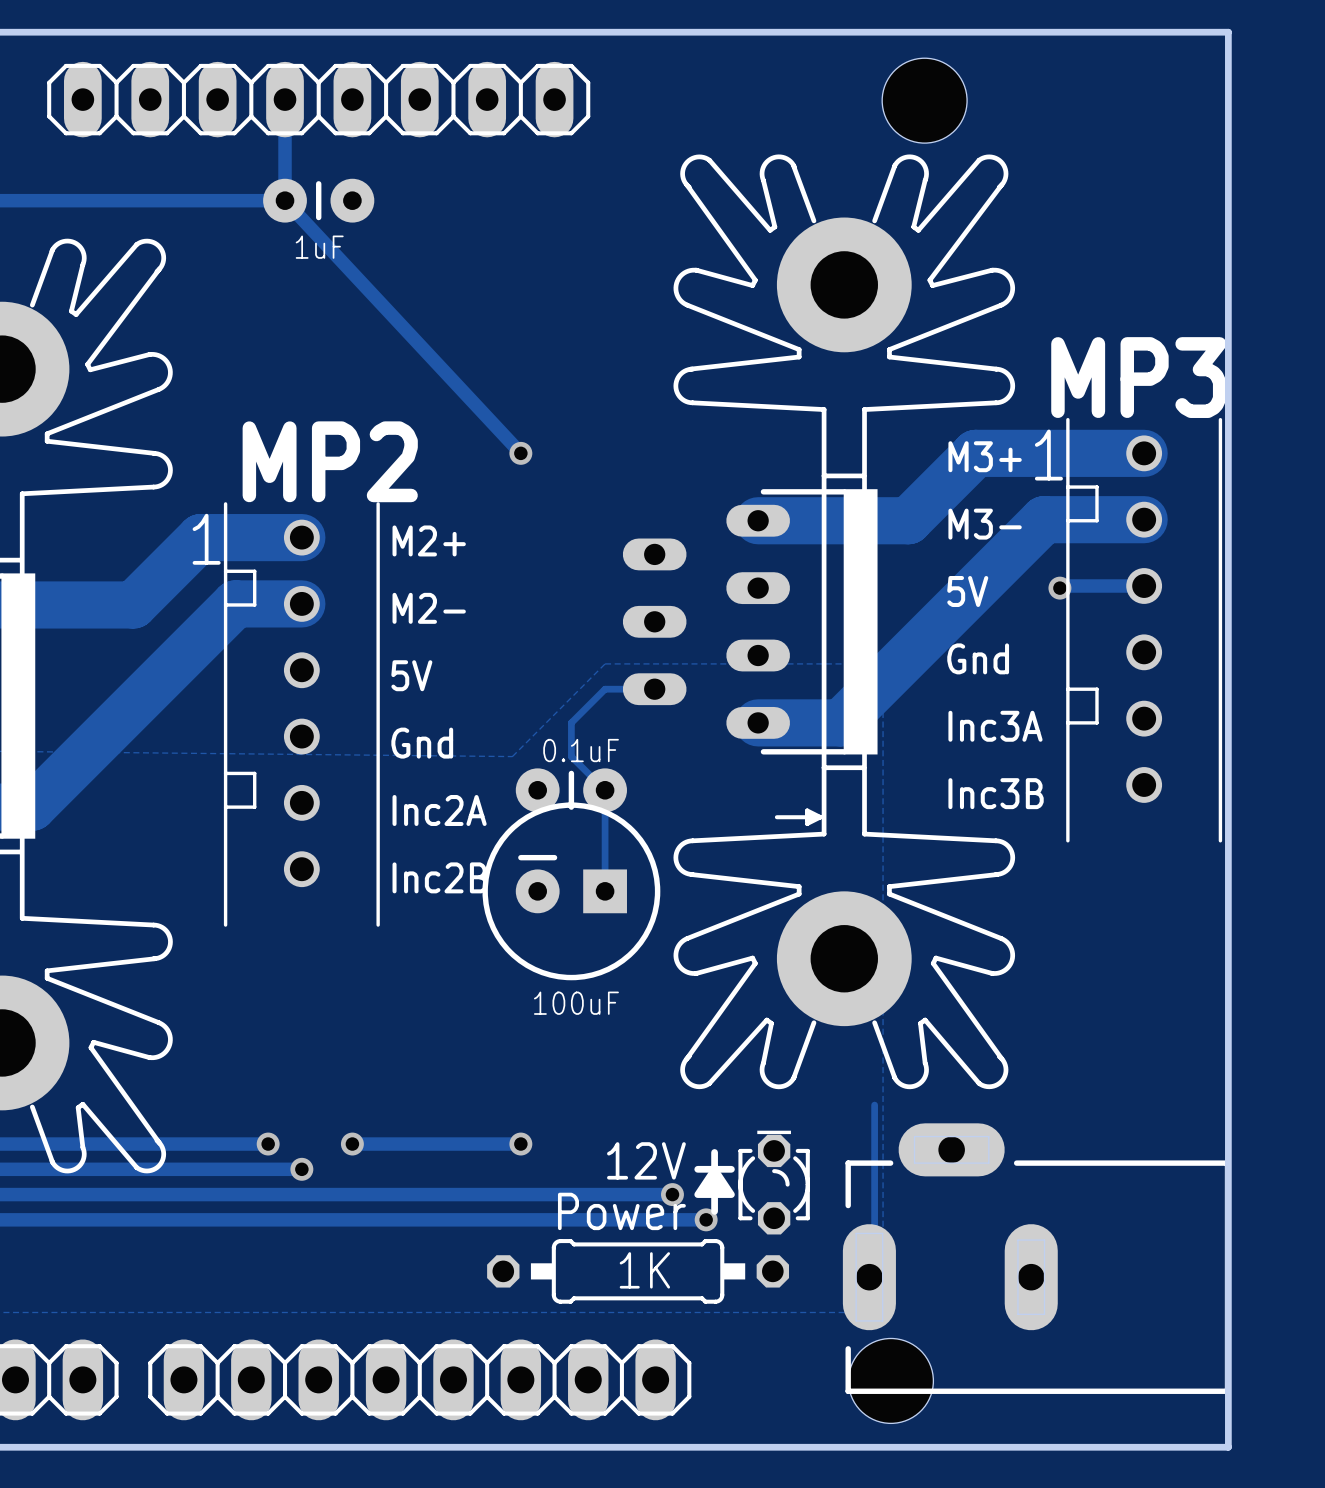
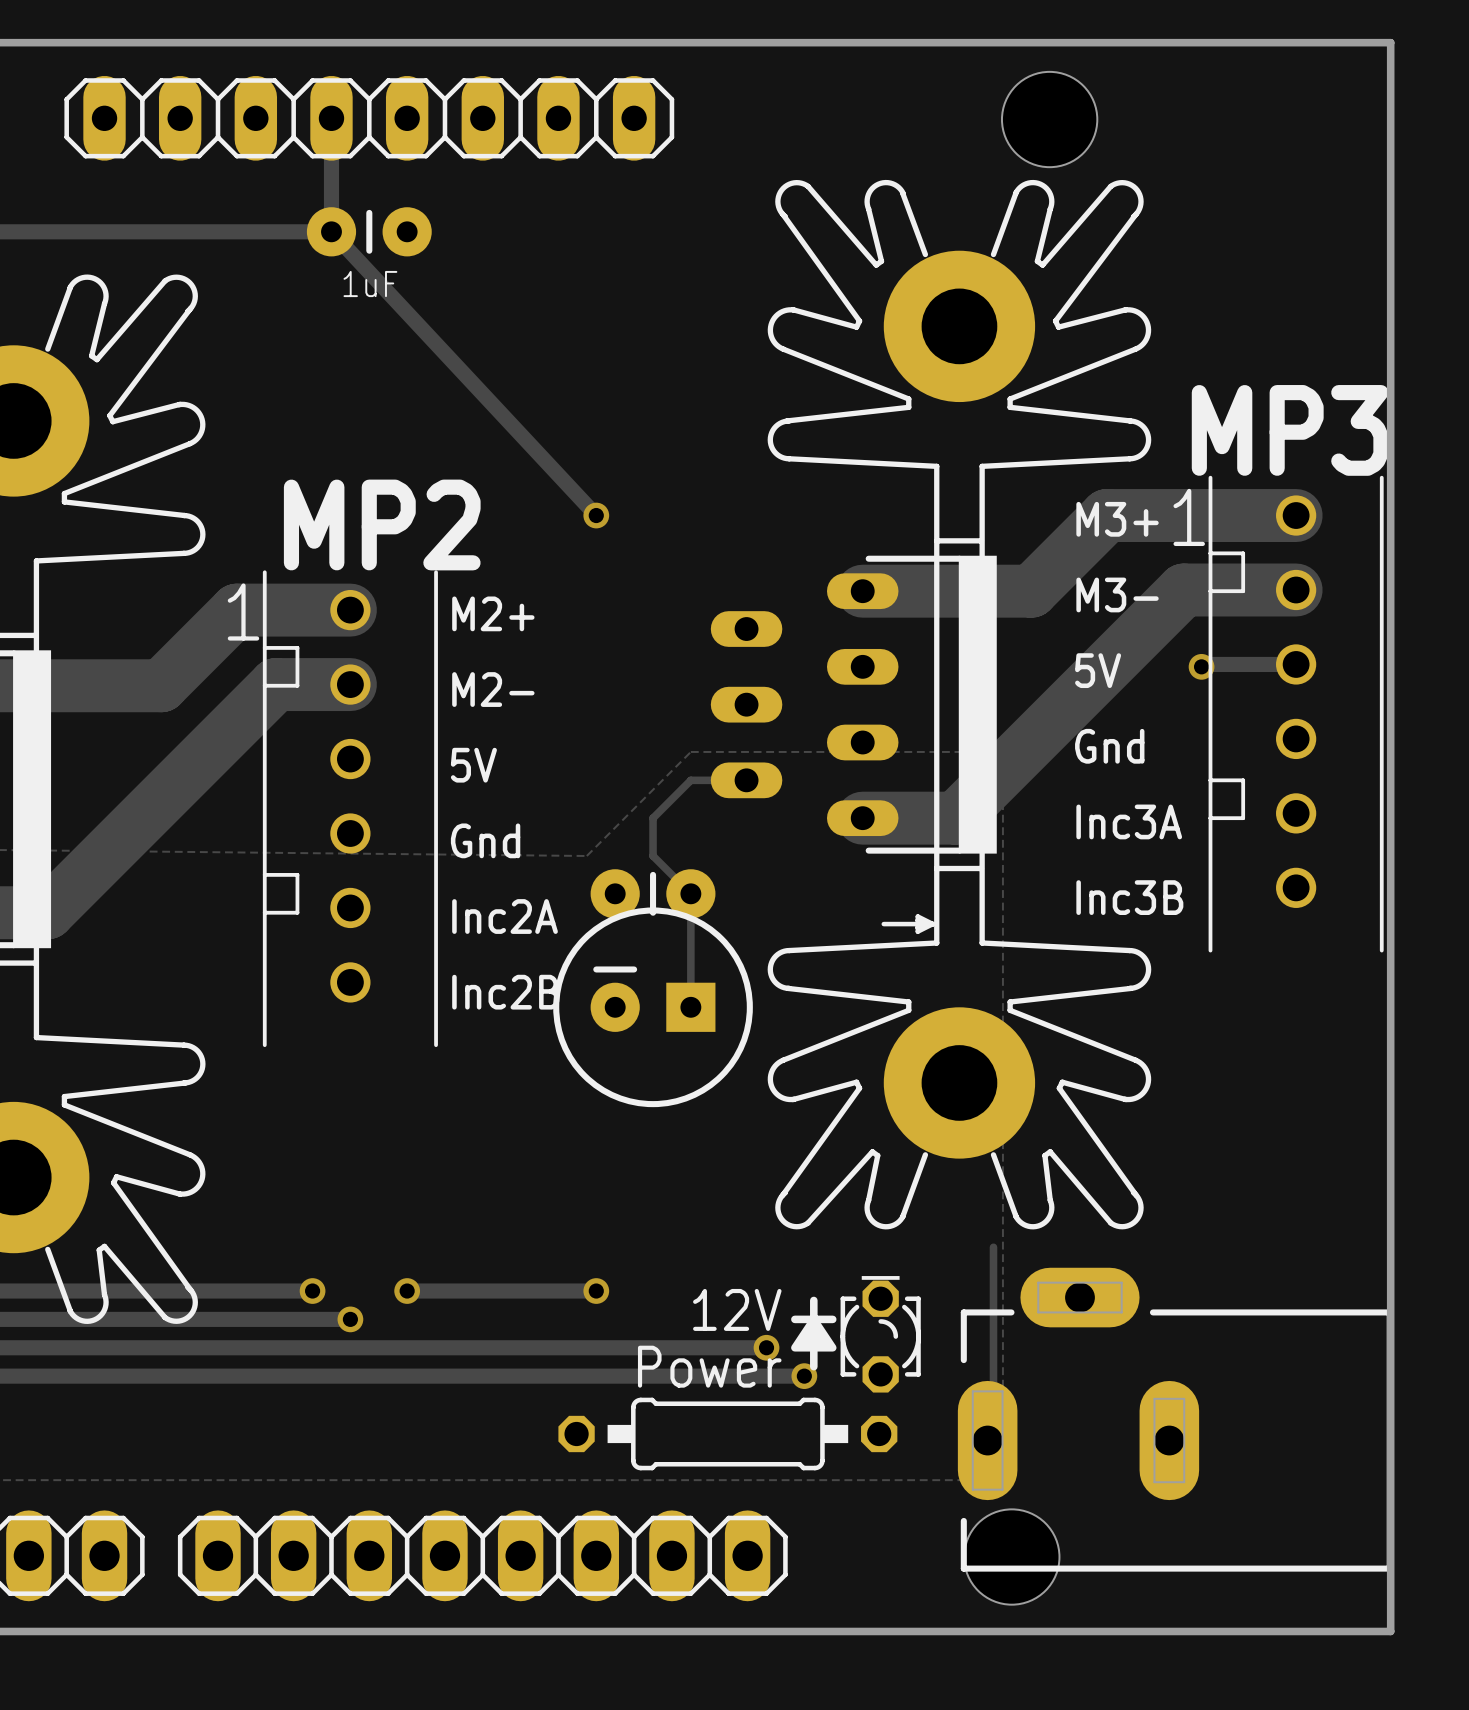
part value: 0.1uF (581, 750) -> none
part value: 100uF (576, 1003) -> none
part value: 1K (644, 1270) -> none

